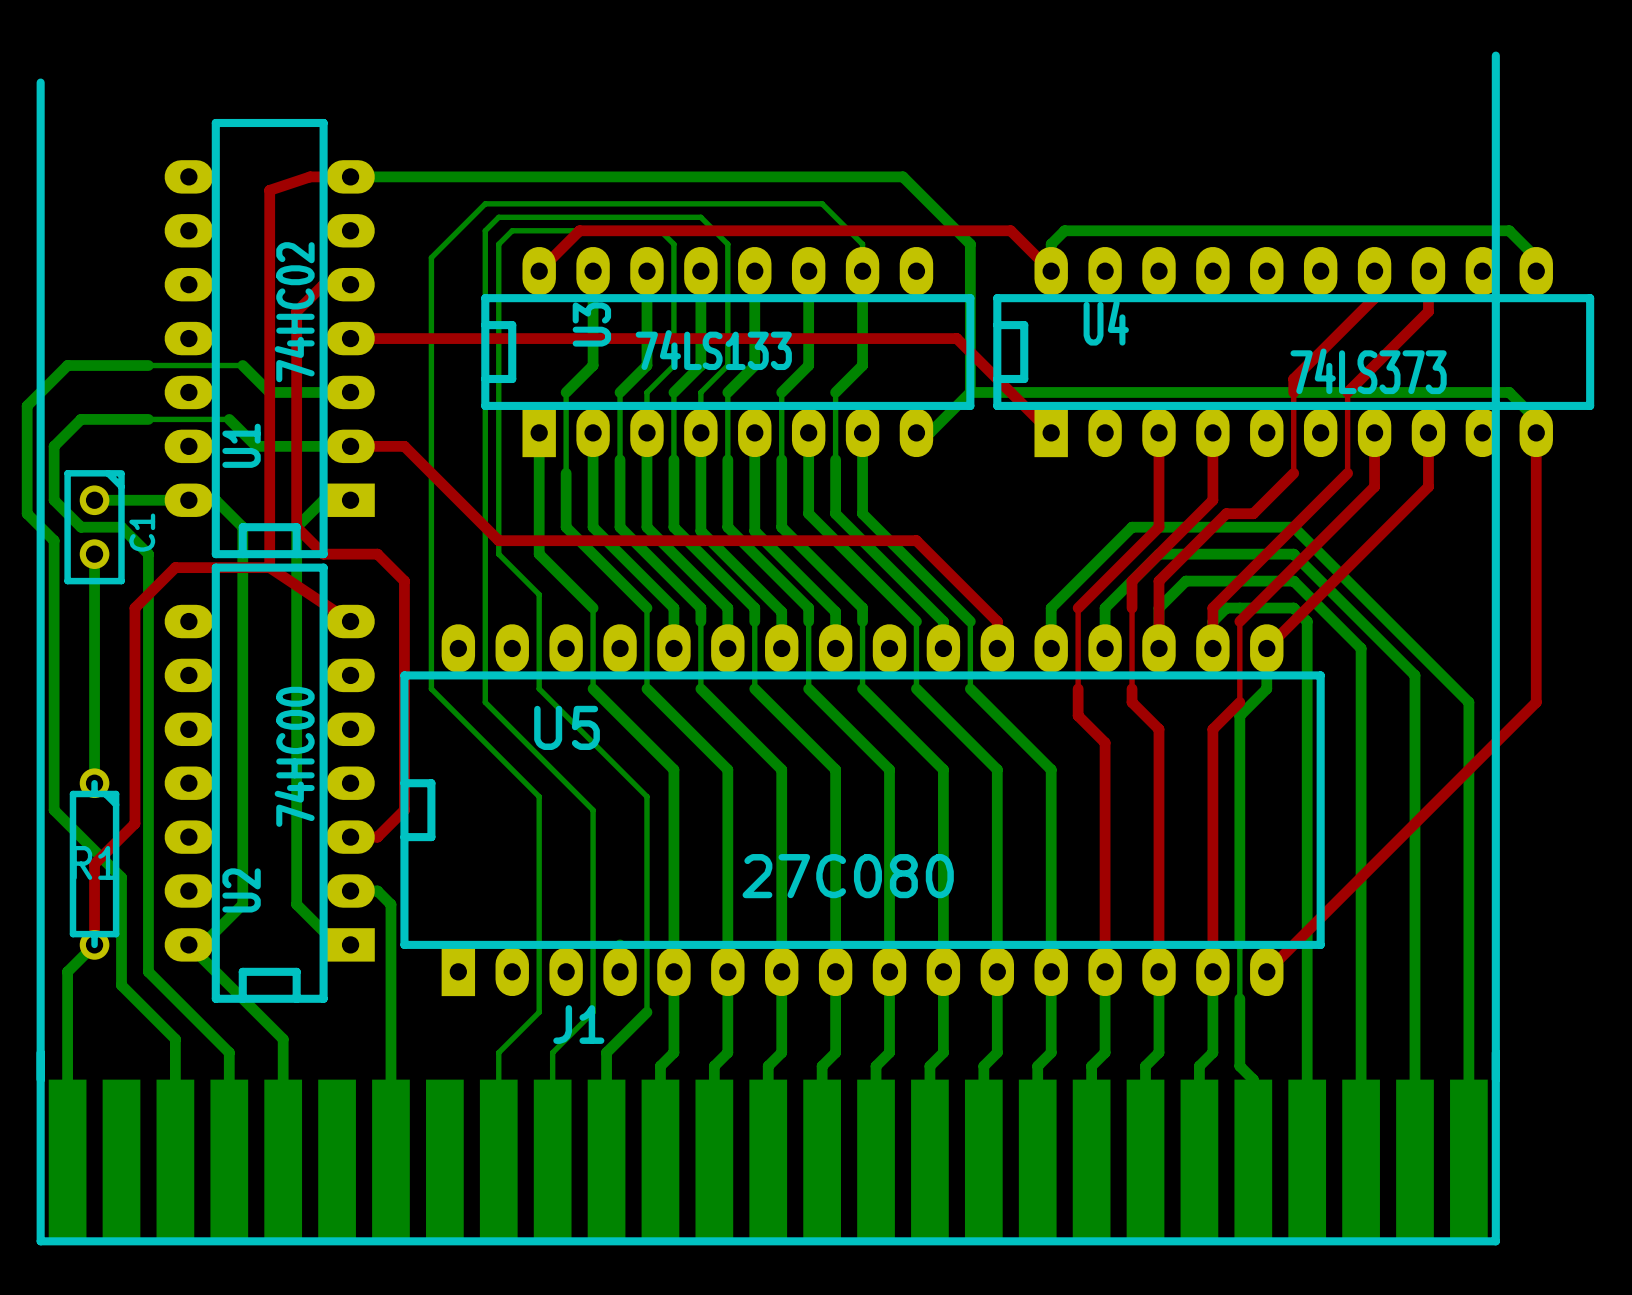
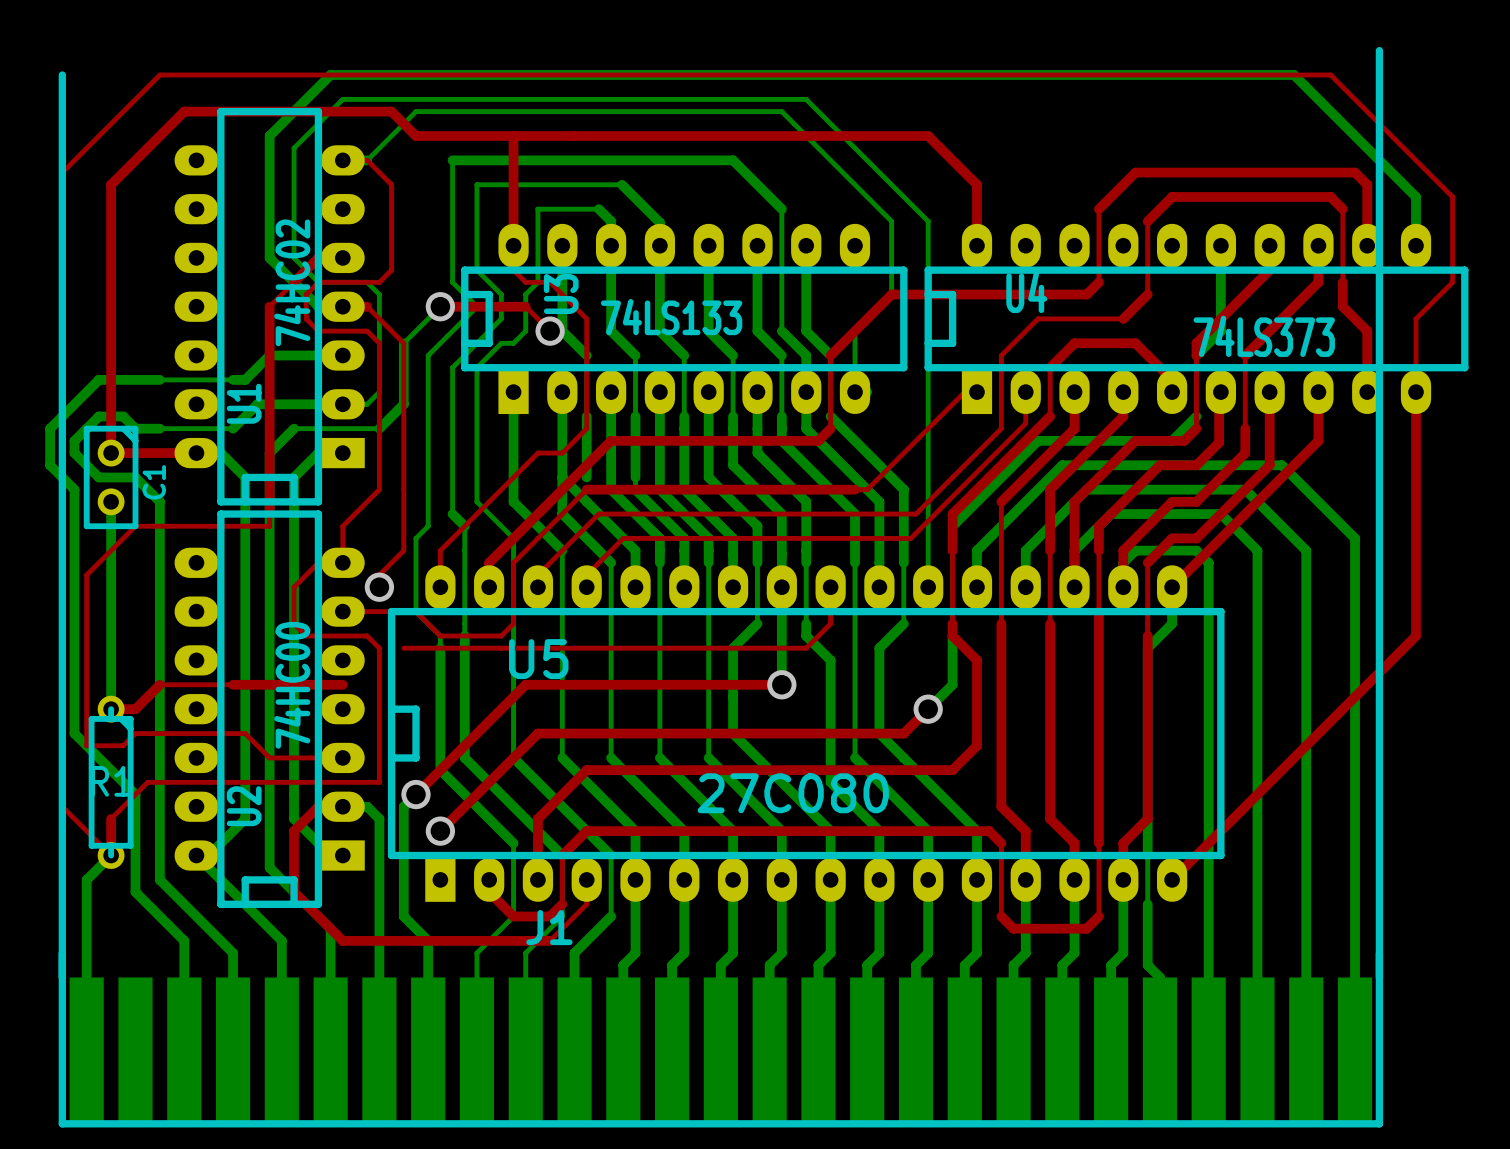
top track: none -> (513, 135) (513, 270) (525, 282) (550, 282) (586, 318) (586, 428) (562, 453) (537, 453) (440, 550) (440, 587)
top track: (350, 176) (310, 176) (269, 190) (269, 338) -> (294, 282) (269, 306)
bottom track: (377, 176) (471, 176) -> (367, 160) (415, 111) (781, 111) (891, 221) (891, 294) (855, 331) (855, 392)
bottom track: (781, 176) (902, 176) (970, 244) (970, 392) -> (733, 160) (781, 209) (781, 331) (806, 355) (806, 392)
bottom track: (498, 203) (485, 203) (431, 257) (431, 594) -> (452, 160) (452, 282) (476, 306) (428, 355) (428, 526) (415, 538)
bottom track: (658, 203) (822, 203) (862, 244) (862, 271) -> (621, 184) (659, 222) (659, 245)
bottom track: (566, 230) (512, 230) (498, 244) -> (476, 184) (476, 221)
bottom track: (633, 230) (660, 230) (673, 244) (673, 365) (646, 392) (646, 432) -> (598, 209) (611, 221) (611, 245)
bottom track: (1536, 257) (1509, 230) (1064, 230) (1051, 244) (1051, 271) -> (1416, 233) (1416, 196) (1294, 75) (330, 75) (269, 135) (269, 257) (318, 306) (342, 306)
top track: (539, 271) (579, 230) (1010, 230) (1051, 271) -> (196, 453) (111, 453) (111, 184) (184, 111) (391, 111) (415, 135) (928, 135) (976, 184) (976, 245)
bottom track: none -> (1220, 245) (1220, 331) (1196, 355) (1196, 416) (1172, 440) (1037, 440) (952, 526) (952, 684) (928, 709)
top track: none -> (1367, 245) (1367, 184) (1355, 172) (1135, 172) (1098, 209) (1098, 282) (1086, 294) (891, 294) (830, 355) (830, 428) (818, 440) (611, 440) (489, 562) (489, 587)
bottom track: (498, 298) (498, 405) -> (537, 209) (537, 282) (525, 294) (525, 331) (513, 343) (501, 343) (476, 367)
top track: (296, 311) (296, 527) (323, 554) (377, 554) (404, 581) (404, 810) (377, 837) (350, 837) -> (269, 514) (269, 526) (135, 526) (86, 575) (86, 745) (123, 745) (135, 733) (245, 733) (269, 757) (342, 757)
top track: (377, 338) (458, 338) -> (367, 306) (403, 343) (403, 550) (379, 575) (379, 587)
bottom track: none -> (440, 306) (403, 343) (403, 404) (379, 428) (294, 428) (269, 453) (269, 867) (330, 928) (330, 1050)
via: none -> (440, 306)
top track: (552, 338) (956, 338) (1051, 432) -> (525, 306) (550, 331)
bottom track: none -> (550, 331) (562, 331) (586, 355)
via: none -> (550, 331)
bottom track: (593, 365) (566, 392) (566, 527) (646, 608) (646, 621) -> (562, 477) (562, 514) (611, 562)
bottom track: (646, 365) (620, 392) -> (611, 331) (635, 355)
bottom track: (700, 365) (673, 392) -> none
bottom track: (754, 365) (727, 392) -> (659, 331) (684, 355)
bottom track: (808, 365) (781, 392) -> (708, 331) (733, 355)
bottom track: (862, 365) (835, 392) -> (757, 331) (781, 355)
bottom track: none -> (806, 331) (830, 355) (830, 416) (903, 489) (903, 562)
bottom track: (269, 392) (242, 365) (67, 365) (27, 405) (27, 473) -> none
bottom track: (970, 392) (1509, 392) (1536, 419) -> none
bottom track: (970, 392) (929, 432) -> none
bottom track: (229, 419) (256, 446) -> (233, 379) (245, 379) (269, 355)
bottom track: (700, 432) (700, 392) (727, 365) (727, 244) (700, 217) (498, 217) (485, 230) (485, 581) -> (476, 270) (501, 294) (501, 318) (452, 367) (452, 514) (464, 526)
top track: none -> (1025, 392) (1025, 423) (910, 538) (623, 538) (586, 575) (586, 587)
top track: none -> (1172, 392) (1172, 379) (1135, 343) (1074, 343) (1050, 367) (1050, 416) (952, 514) (952, 636) (976, 660) (976, 745) (952, 770) (586, 770) (537, 818) (537, 879)
top track: none -> (1220, 392) (1219, 393) (1219, 442) (1196, 465) (1159, 465) (1098, 526) (1098, 916) (1086, 928) (1013, 928) (1001, 916) (1001, 843) (989, 831) (586, 831) (562, 855) (562, 904) (550, 916) (513, 916) (489, 892) (489, 879)
top track: none -> (1367, 392) (1367, 331) (1342, 306) (1342, 209) (1330, 196) (1172, 196) (1147, 221) (1147, 294) (1123, 318) (1037, 318) (1001, 355) (1001, 428) (916, 514) (598, 514) (537, 575) (537, 587)
top track: none -> (1416, 392) (1416, 318) (1452, 282) (1452, 196) (1330, 75) (159, 75) (62, 172) (62, 806) (111, 855)
bottom track: (54, 446) (54, 486) -> (74, 404) (50, 428)
bottom track: none -> (257, 404) (233, 428) (135, 428) (123, 416) (98, 416) (74, 440)
top track: (350, 446) (404, 446) (498, 540) (620, 540) -> (342, 611) (415, 611) (440, 636) (501, 636) (513, 623) (513, 562) (586, 489)
bottom track: none -> (342, 404) (367, 404) (379, 392) (379, 294) (367, 282) (318, 282) (294, 257) (294, 148) (342, 99) (806, 99) (928, 221) (928, 587)
top track: (1212, 459) (1212, 500) -> (1184, 440) (1135, 440) (1123, 453)
top track: none -> (1123, 416) (1050, 489) (1050, 526)
bottom track: (862, 473) (862, 513) -> (781, 440) (806, 465)
top track: (1158, 473) (1158, 527) (1078, 608) -> (1074, 428) (1001, 501) (1001, 550)
top track: (1347, 473) (1266, 554) -> (1245, 428) (1245, 453) (1196, 501) (1172, 501)
bottom track: (835, 486) (835, 513) (943, 621) -> (806, 428) (879, 501) (879, 562)
top track: (1280, 486) (1253, 513) (1226, 513) (1158, 581) -> none
top track: (1374, 486) (1266, 594) -> (1269, 440) (1269, 465) (1196, 538) (1172, 538)
bottom track: (94, 500) (188, 500) -> none
bottom track: (808, 500) (808, 513) (916, 621) -> (757, 453) (806, 501) (806, 550)
bottom track: (781, 513) (781, 527) (862, 608) -> (733, 465) (781, 514) (781, 554)
bottom track: (620, 527) (700, 608) -> (611, 477) (611, 489) (659, 538) (659, 550)
bottom track: (646, 527) (727, 608) -> (635, 477) (635, 489) (684, 538) (684, 550)
bottom track: (673, 527) (754, 608) -> (659, 480) (659, 489) (708, 538) (708, 550)
bottom track: (727, 527) (808, 608) -> (708, 477) (757, 526) (757, 550)
bottom track: (754, 527) (754, 531) (835, 611) -> none
bottom track: (1132, 527) (1293, 527) (1468, 702) -> (1050, 477) (1062, 465) (1281, 465) (1355, 538) (1355, 636)
bottom track: (700, 531) (781, 611) -> (684, 477) (684, 489) (733, 538) (733, 554)
top track: (916, 540) (997, 621) (997, 648) -> (855, 489) (867, 489) (964, 392) (976, 392) (976, 404)
top track: (1158, 554) (1132, 581) -> (1074, 501) (1074, 526)
bottom track: (1158, 554) (1293, 554) (1414, 675) -> (1074, 501) (1086, 489) (1245, 489) (1306, 550) (1306, 611)
bottom track: (916, 567) (970, 621) -> (855, 514) (855, 562)
bottom track: (1185, 581) (1293, 581) (1361, 648) -> (1098, 526) (1111, 514) (1220, 514) (1257, 550) (1257, 587)
top track: (350, 621) (269, 567) (175, 567) (134, 608) (134, 823) (94, 864) (94, 904) -> (342, 160) (367, 160) (391, 184) (391, 270) (379, 282) (318, 282) (306, 294) (306, 318) (318, 331) (367, 331) (379, 343) (379, 489) (342, 526) (342, 562) (318, 562) (294, 587) (294, 623) (306, 636) (367, 636) (379, 648) (379, 782) (147, 782) (111, 818)
via: none -> (379, 587)
bottom track: none -> (781, 587) (781, 684)
top track: none -> (830, 587) (830, 623) (806, 648) (403, 648)
bottom track: (431, 675) (431, 688) (539, 796) -> (415, 611) (440, 636) (440, 770) (513, 843)
bottom track: (539, 688) (646, 796) -> (513, 623) (513, 721)
bottom track: (593, 688) (673, 769) (673, 917) -> none
bottom track: (646, 688) (727, 769) (727, 917) -> (611, 623) (611, 721)
bottom track: (700, 688) (781, 769) -> (757, 623) (733, 648) (733, 696)
bottom track: none -> (659, 623) (659, 757) (733, 831)
bottom track: (754, 688) (835, 769) (835, 917) -> (708, 623) (708, 757) (781, 831)
bottom track: (808, 688) (889, 769) -> (806, 623) (806, 636) (830, 660) (830, 696)
bottom track: (862, 688) (943, 769) -> (903, 623) (879, 648) (879, 696)
bottom track: (916, 688) (997, 769) (997, 917) -> (855, 623) (855, 757) (928, 831)
bottom track: (970, 688) (1051, 769) (1051, 917) -> none
bottom track: (485, 702) (593, 810) -> (562, 623) (562, 733)
bottom track: none -> (464, 636) (464, 757) (562, 855)
top track: (1132, 702) (1158, 729) (1158, 931) -> (1050, 636) (1050, 818) (1074, 843)
top track: (1239, 702) (1212, 729) (1212, 931) -> (1147, 636) (1147, 818) (1123, 843)
top track: (1078, 715) (1105, 742) (1105, 917) -> (1001, 648) (1001, 806) (1025, 831)
top track: none -> (342, 684) (159, 684) (135, 709) (111, 709)
top track: none -> (781, 684) (525, 684) (415, 794)
via: none -> (781, 684)
top track: none -> (928, 709) (903, 733) (537, 733) (440, 831)
via: none -> (928, 709)
bottom track: (781, 810) (781, 917) -> (733, 733) (830, 831)
bottom track: (943, 810) (943, 917) -> (879, 733) (976, 831)
bottom track: (539, 837) (539, 931) -> (513, 757) (611, 855)
bottom track: (593, 837) (593, 944) -> (562, 757) (635, 831)
bottom track: (646, 837) (646, 944) -> (611, 757) (684, 831)
bottom track: (889, 864) (889, 917) -> (830, 782) (879, 831)
bottom track: none -> (415, 794) (403, 806) (403, 916) (428, 940) (428, 1050)
via: none -> (415, 794)
top track: none -> (342, 806) (318, 806) (294, 831) (294, 892) (342, 940) (550, 940) (586, 904) (586, 879)
via: none -> (440, 831)

